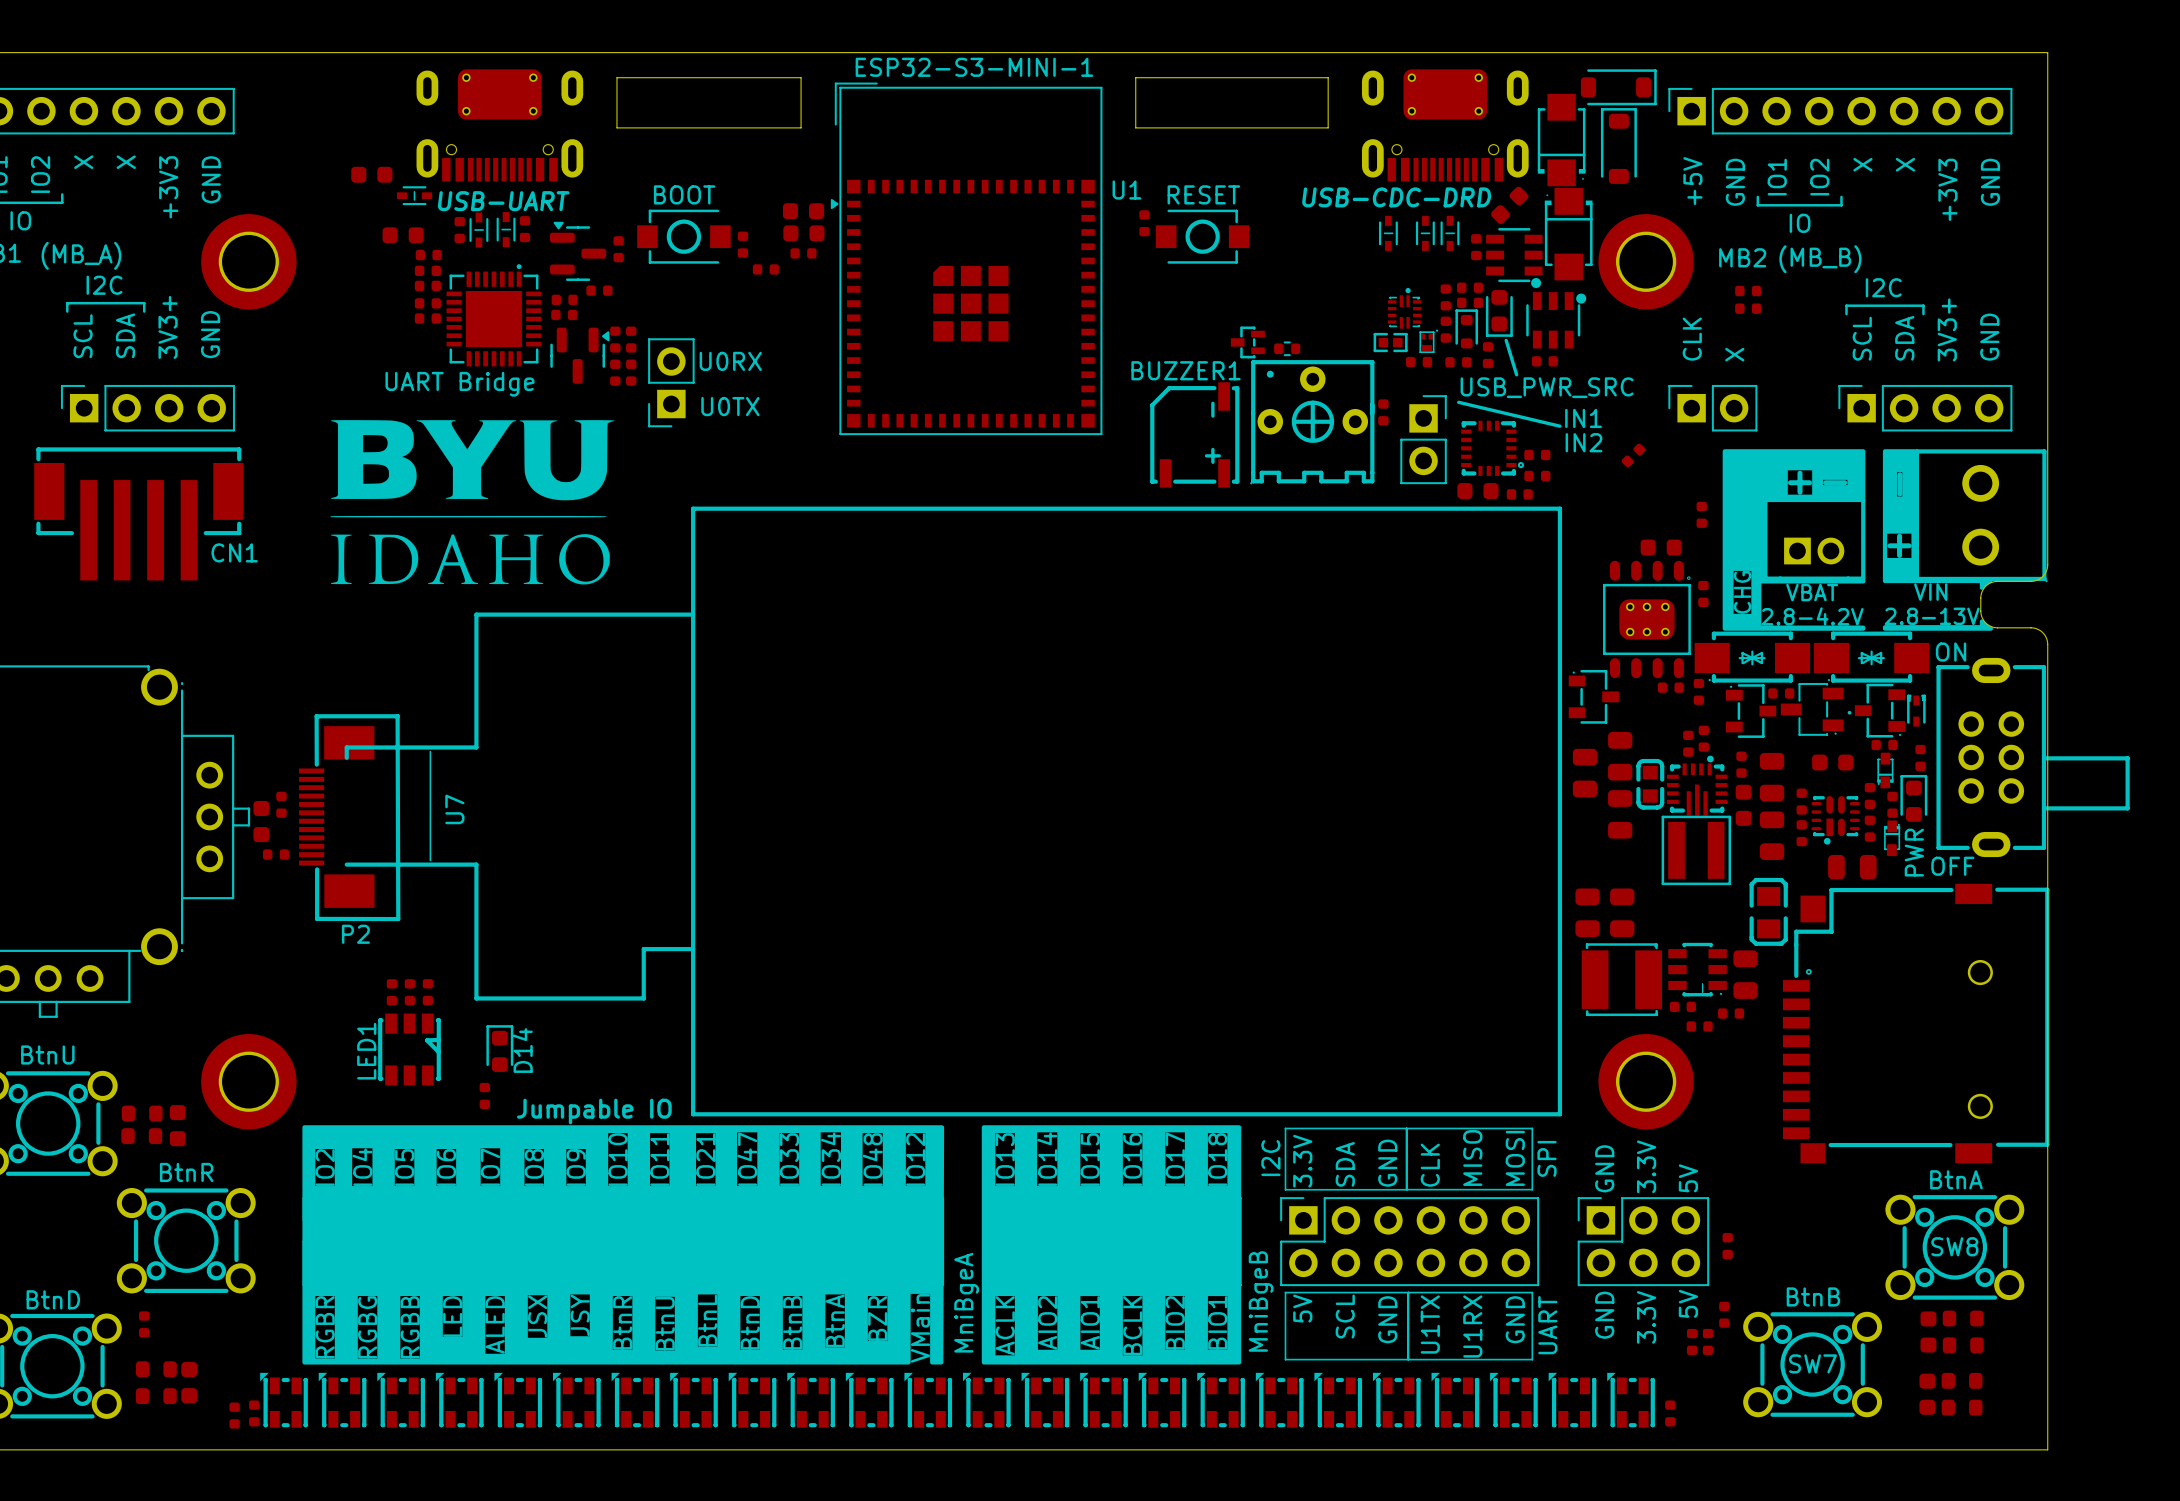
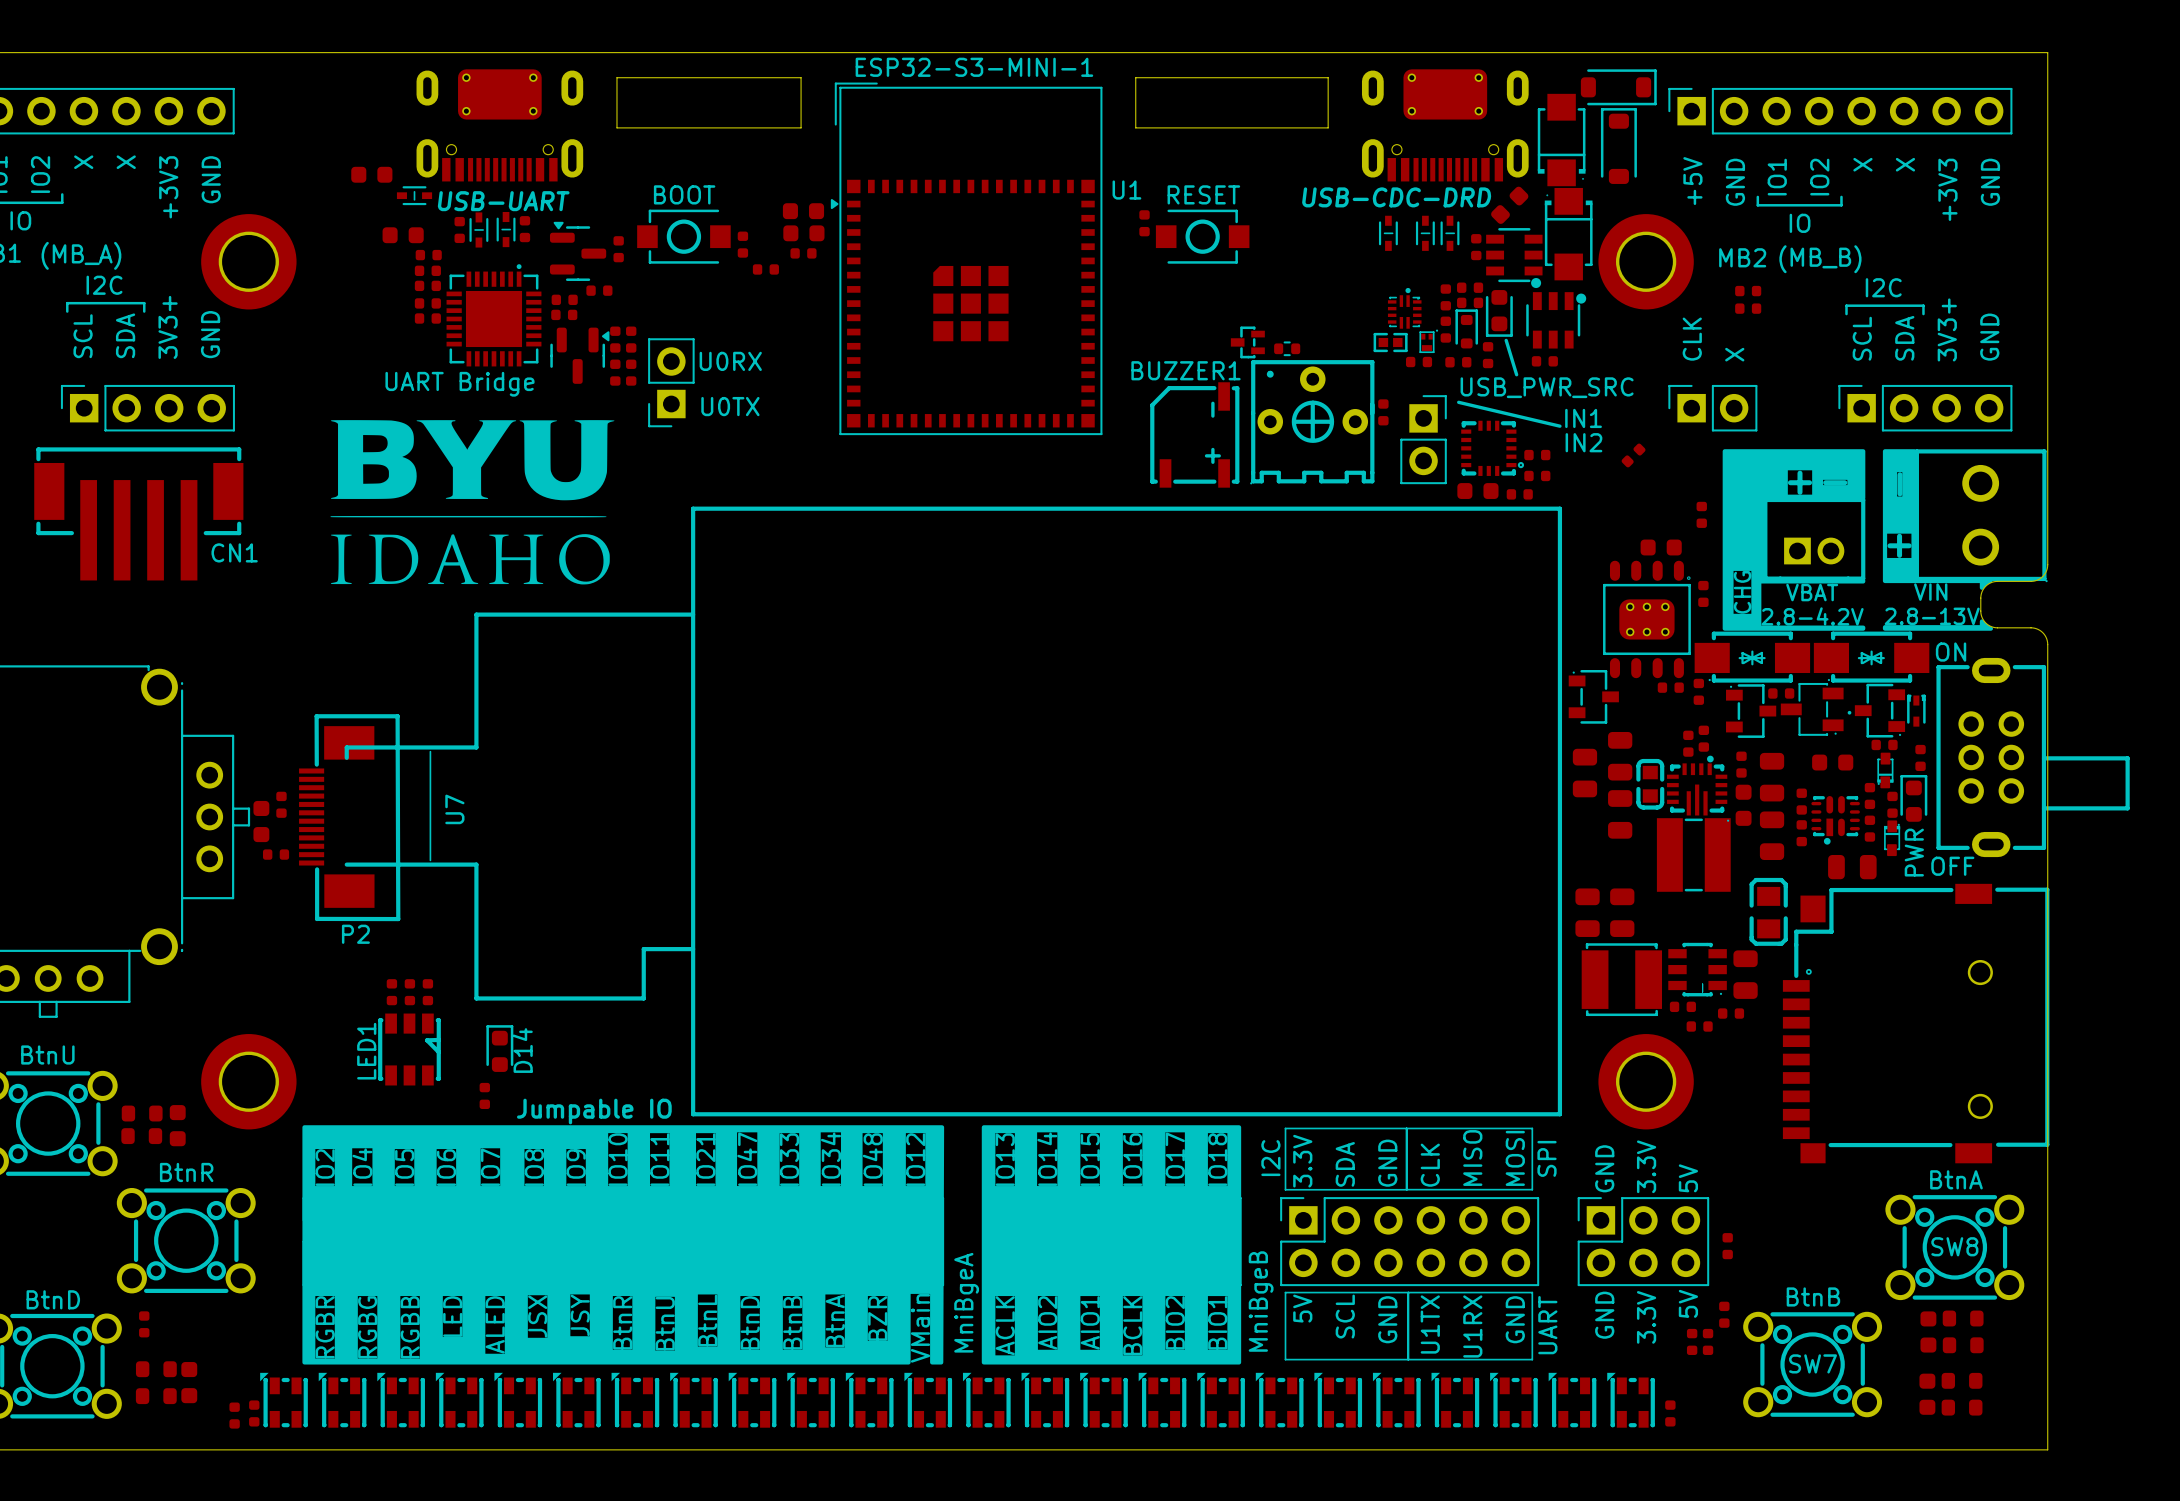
part footprint: [1661, 815, 1732, 886] -> [1656, 818, 1731, 892]

